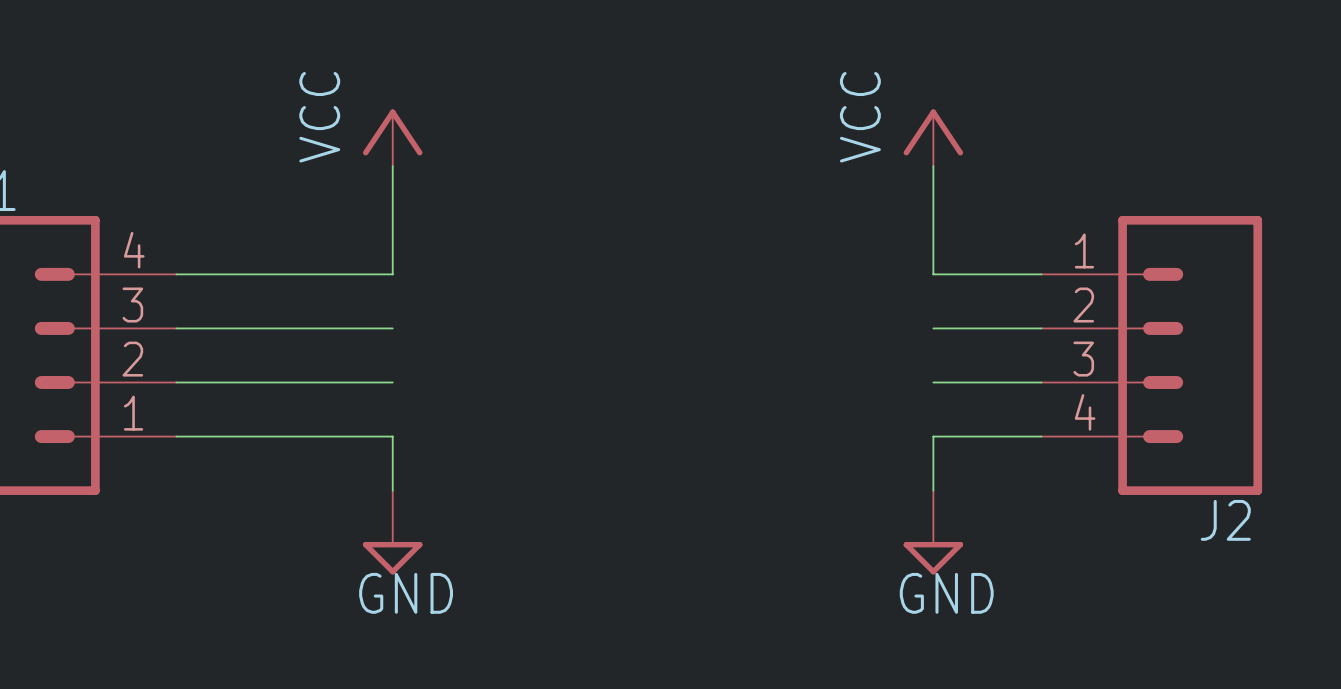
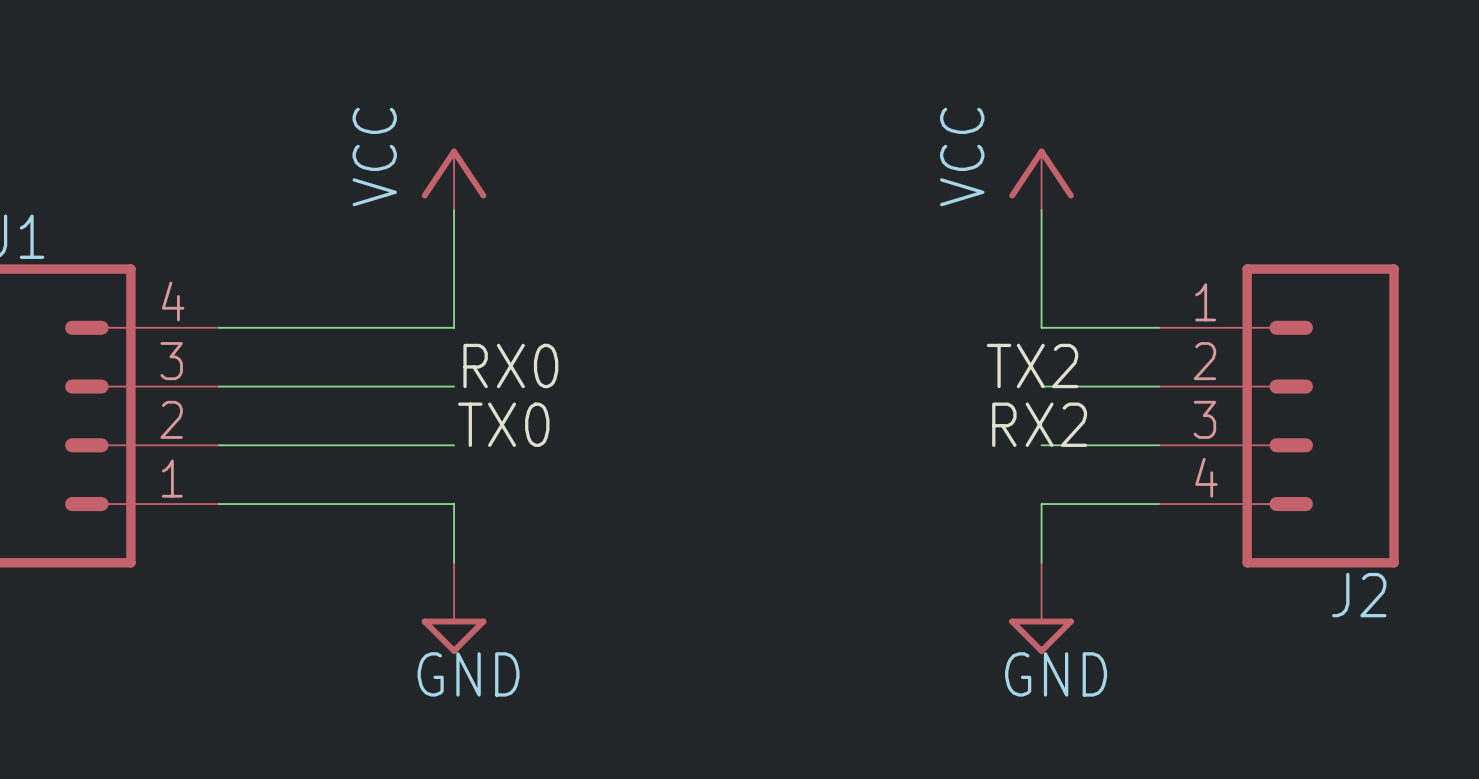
label: none -> RX0 (510, 365)
label: none -> TX2 (1032, 365)
label: none -> TX0 (503, 424)
label: none -> RX2 (1039, 424)

